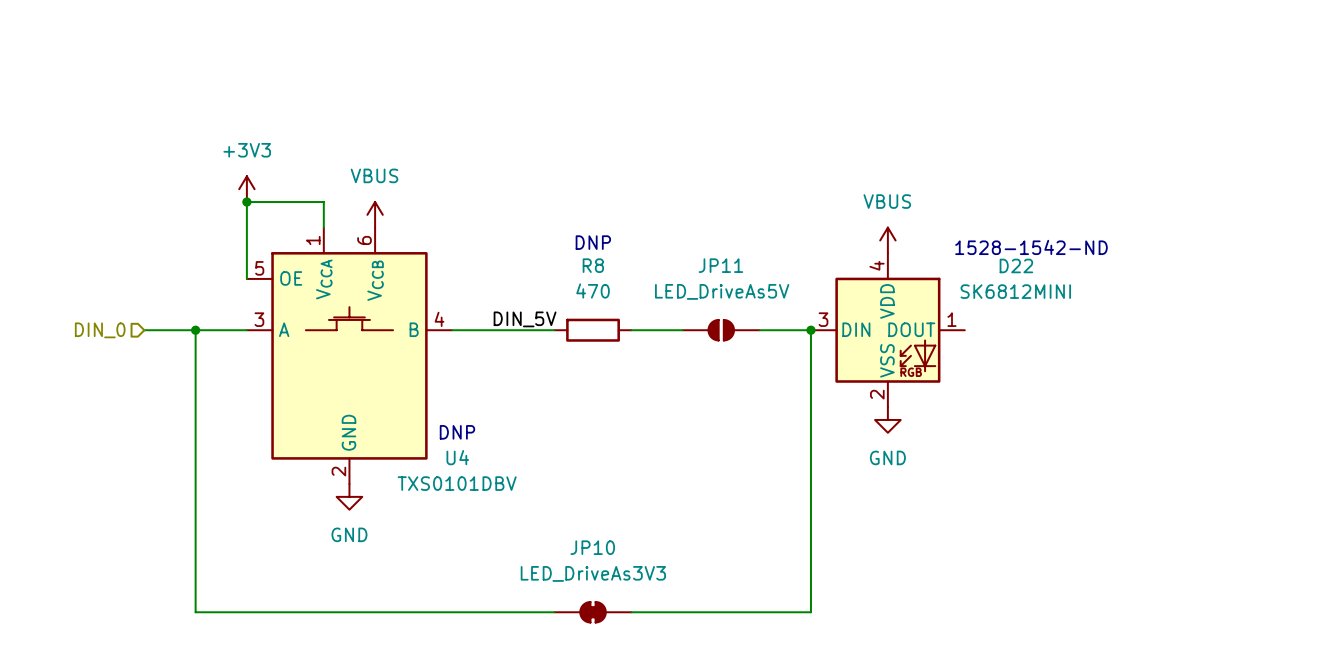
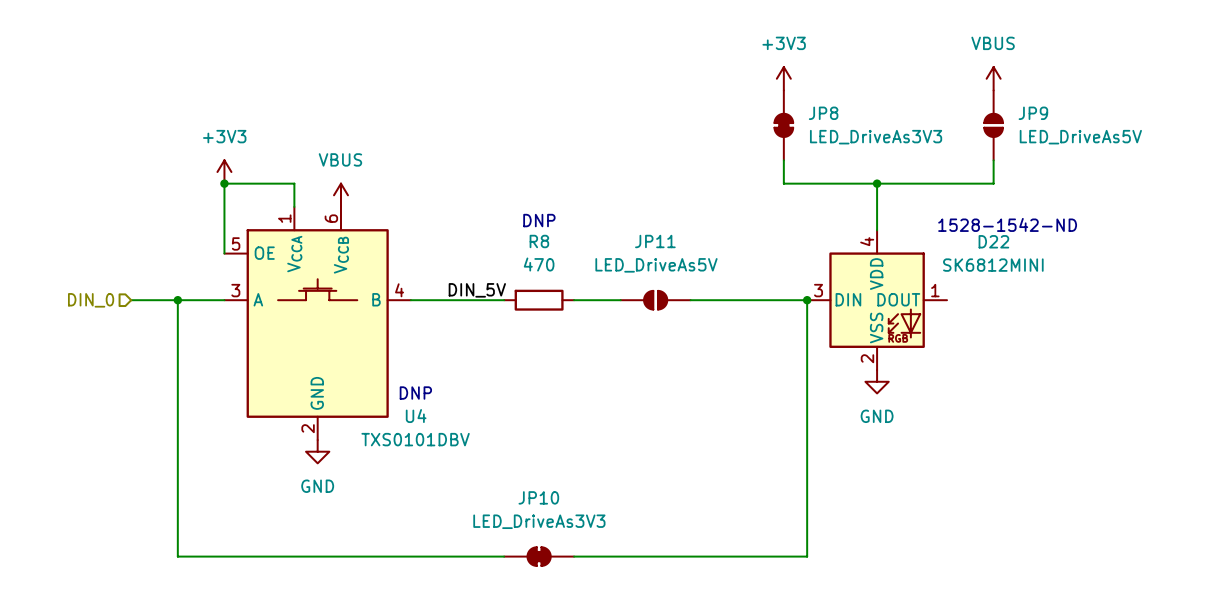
power symbol: none -> +3V3 (783, 78)
power symbol: none -> VBUS (993, 78)
JP8: none -> LED_DriveAs3V3 (783, 125)
JP9: none -> LED_DriveAs5V (993, 125)
wire: none -> (783, 160) (783, 183) (993, 183) (993, 160)
wire: none -> (877, 183) (877, 230)
junction: none -> (877, 183)
power symbol: VBUS (887, 240) -> none
text position: 1528-1542-ND (1031, 247) -> 1528-1542-ND (1007, 224)
wire: (810, 330) (810, 612) -> (737, 300) (807, 300) (807, 556) (737, 556)
junction: (810, 330) -> none
junction: none -> (807, 300)
D22 position: (887, 330) -> (877, 300)
power symbol position: GND (887, 419) -> GND (877, 381)

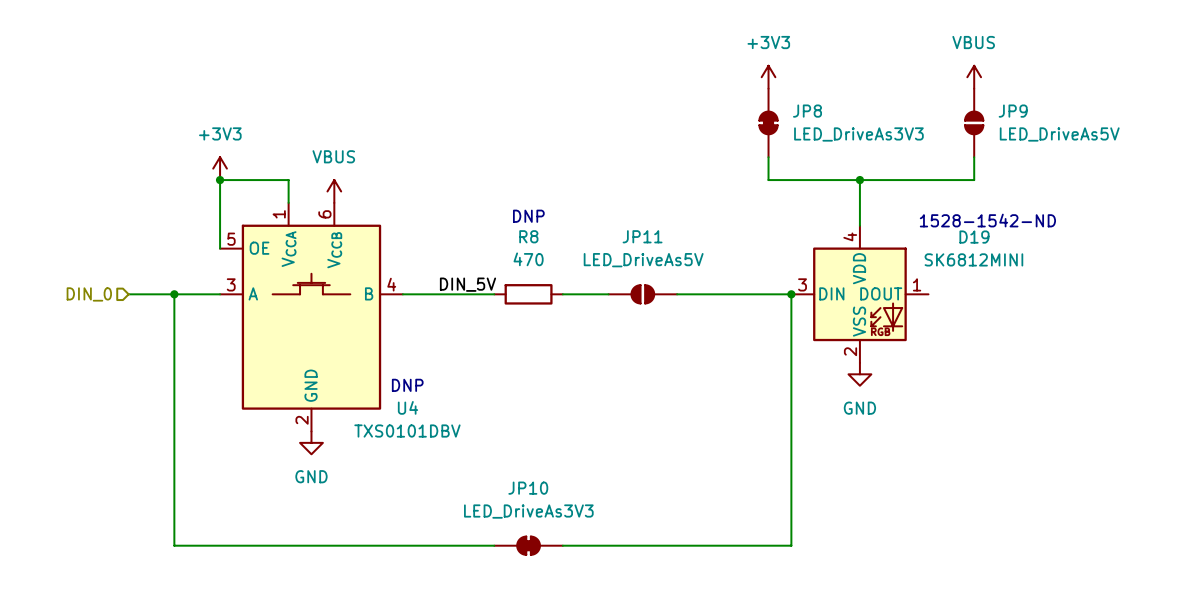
D22 name: D22 (993, 241) -> D19 (974, 237)

